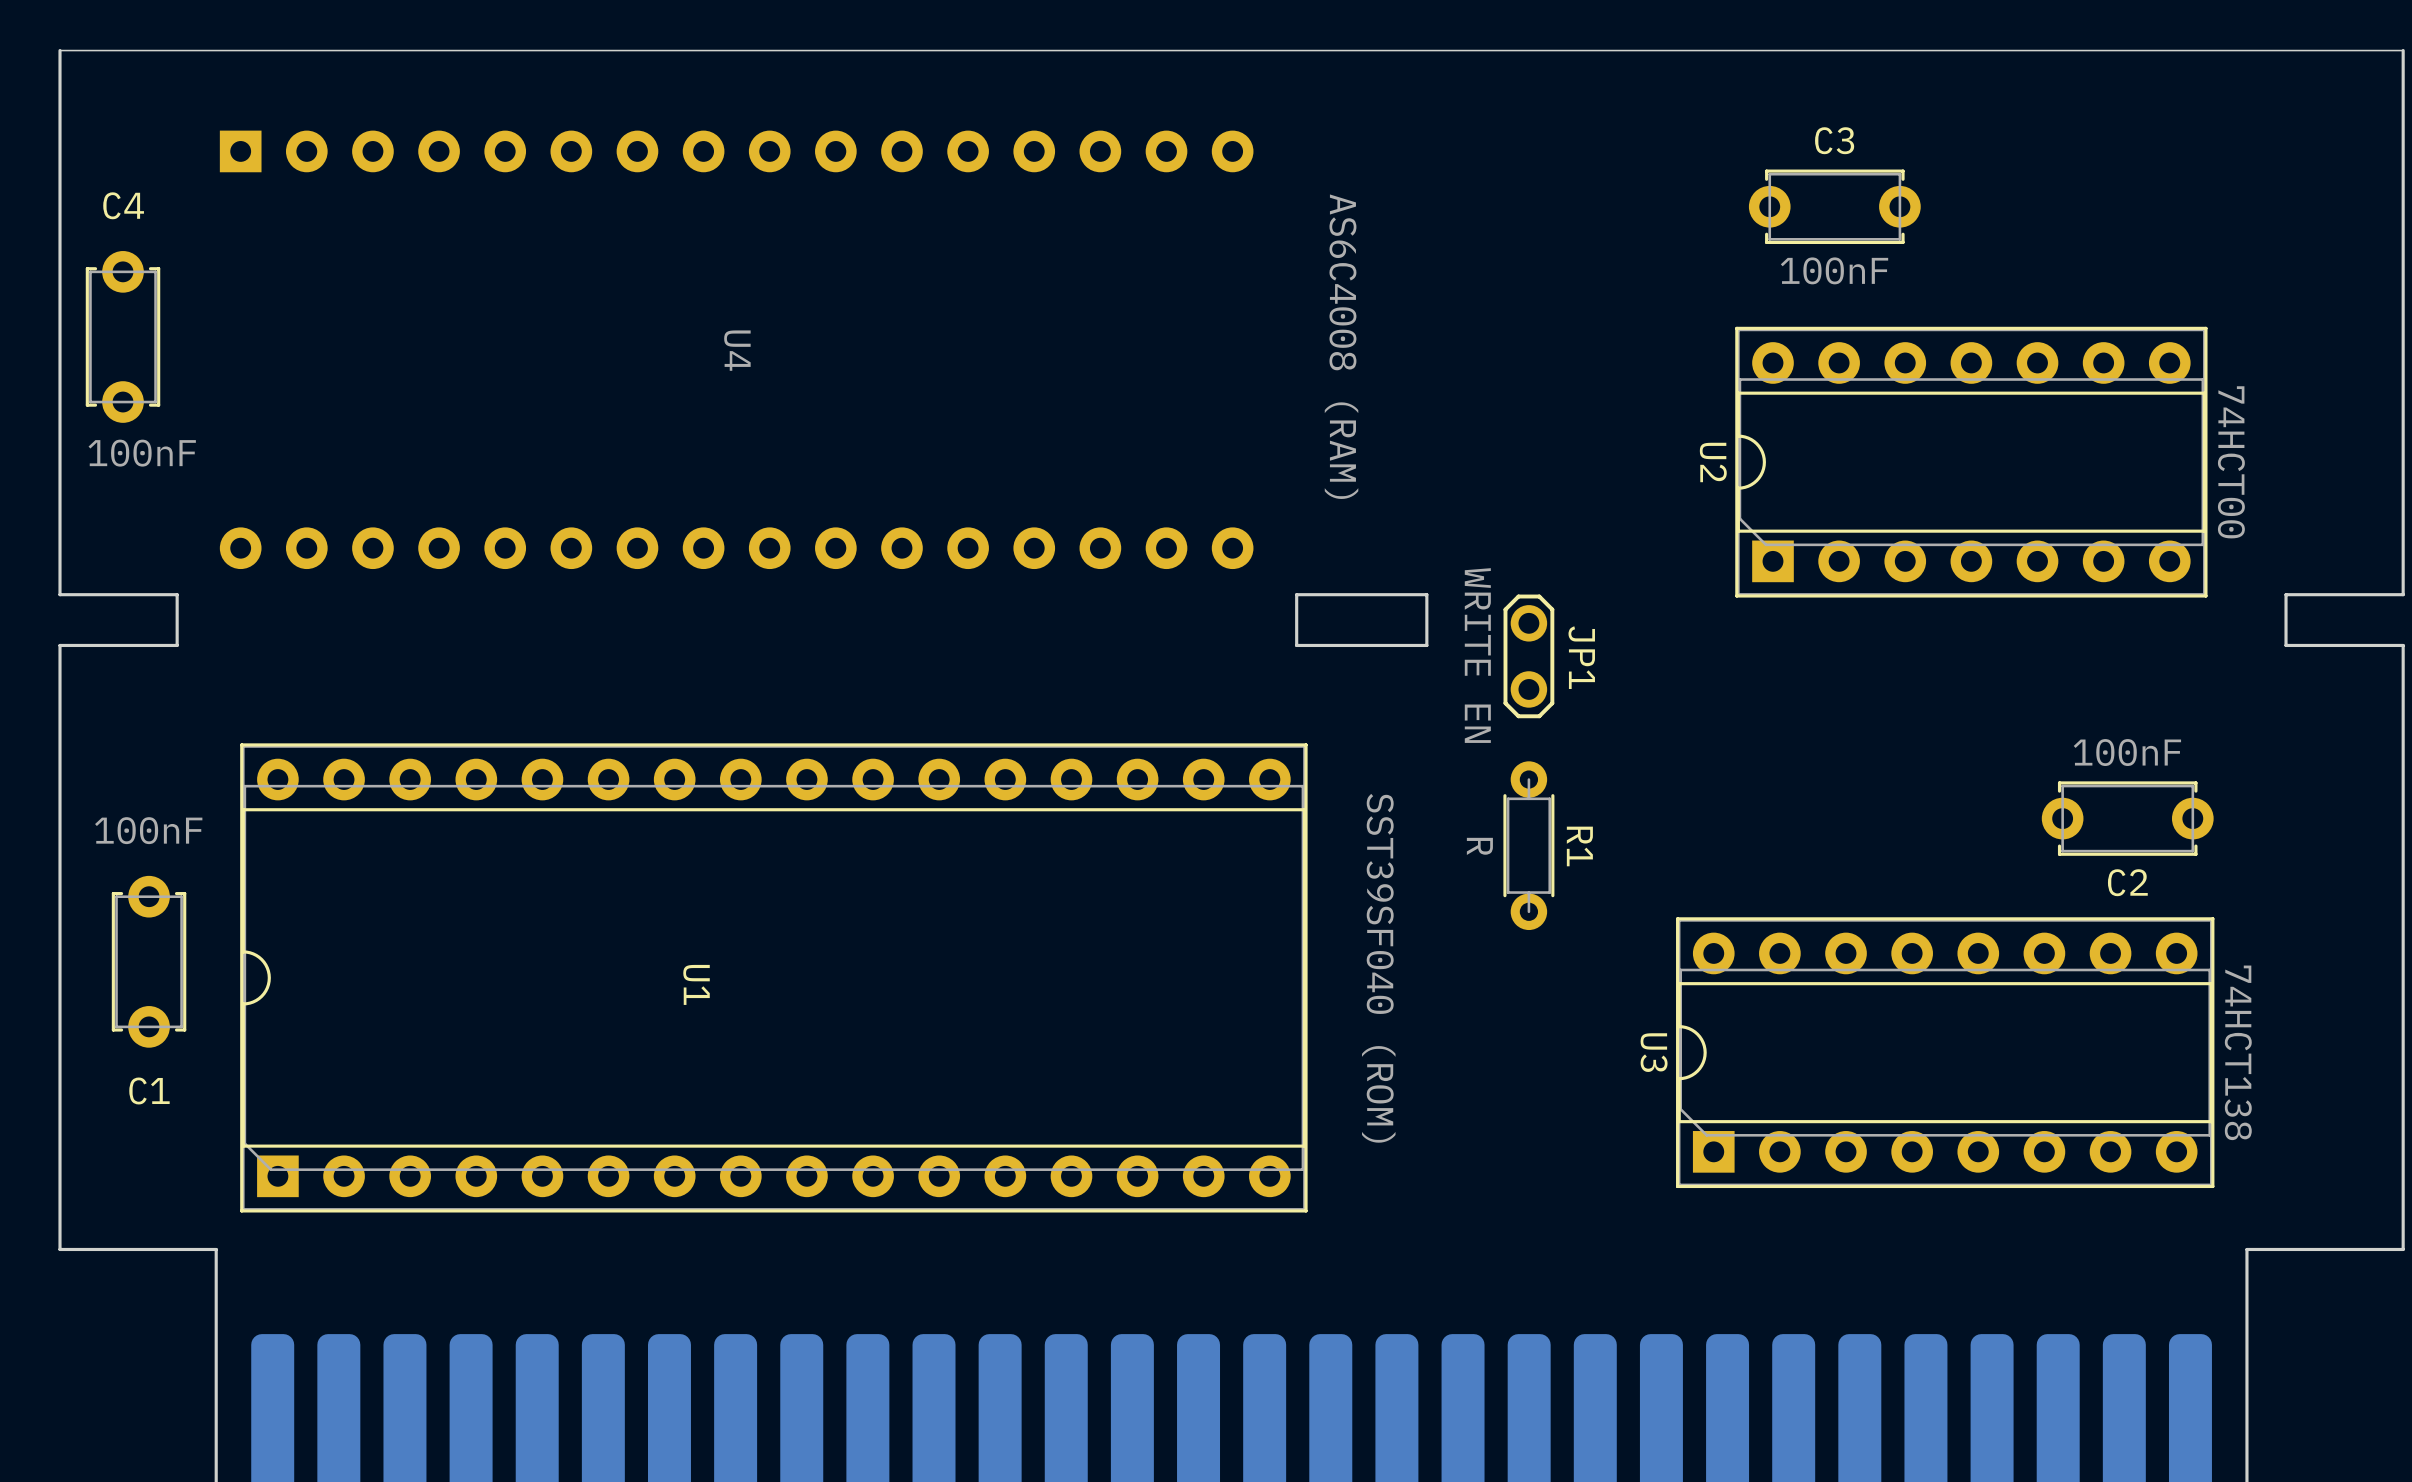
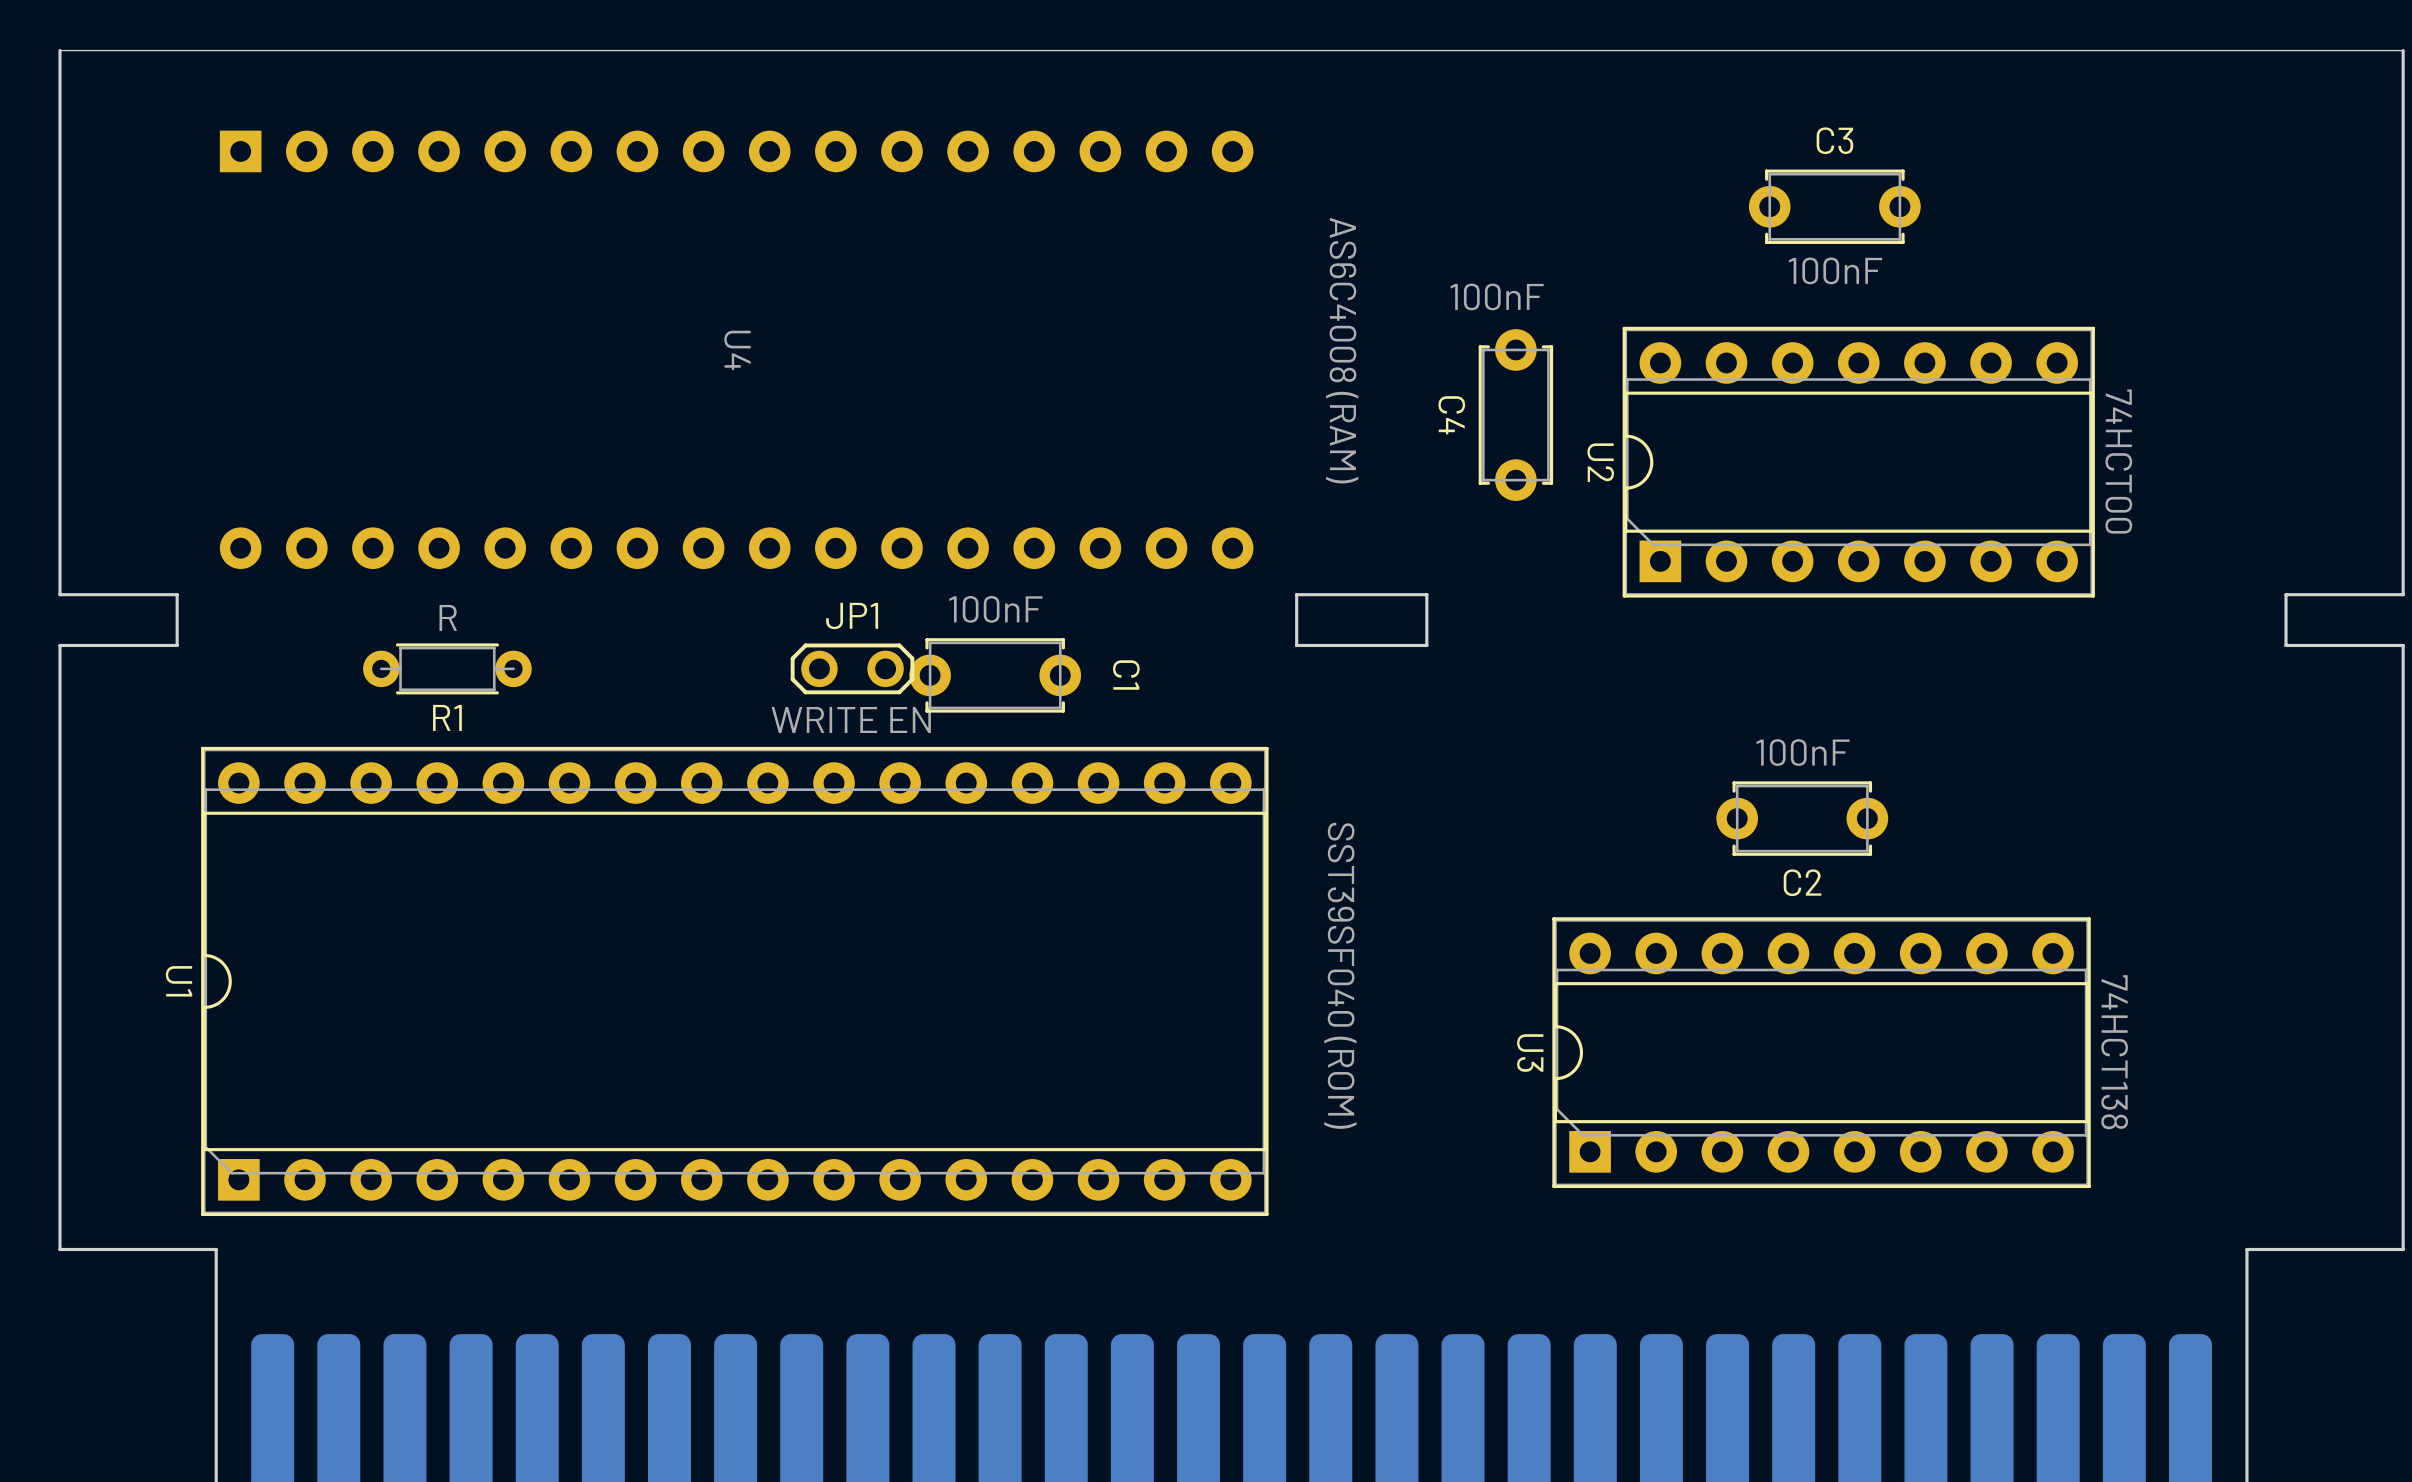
C4 name rotation: 0° (123, 205) -> 90° clockwise (1451, 415)
C4 name position: C4 (123, 205) -> C4 (1451, 415)
C4 position: (123, 336) -> (1515, 415)
C4 value position: 100nF (142, 453) -> 100nF (1497, 296)
U2 position: (1971, 462) -> (1858, 462)
JP1 value position: WRITE EN (1477, 655) -> WRITE EN (851, 719)
JP1 rotation: 0° (1528, 656) -> 90° clockwise (852, 668)
JP1 position: (1528, 656) -> (852, 668)
JP1 name position: JP1 (1581, 657) -> JP1 (852, 615)
C2 position: (2127, 818) -> (1802, 818)
C1 value position: 100nF (148, 830) -> 100nF (995, 609)
R1 rotation: 0° (1528, 845) -> 90° clockwise (447, 668)
R1 position: (1528, 845) -> (447, 668)
C1 rotation: 0° (149, 961) -> 90° clockwise (995, 675)
C1 position: (149, 961) -> (995, 675)
U1 position: (773, 977) -> (734, 981)
U1 name position: U1 (696, 984) -> U1 (179, 981)
U3 position: (1945, 1052) -> (1821, 1052)
C1 name position: C1 (149, 1090) -> C1 (1126, 675)

